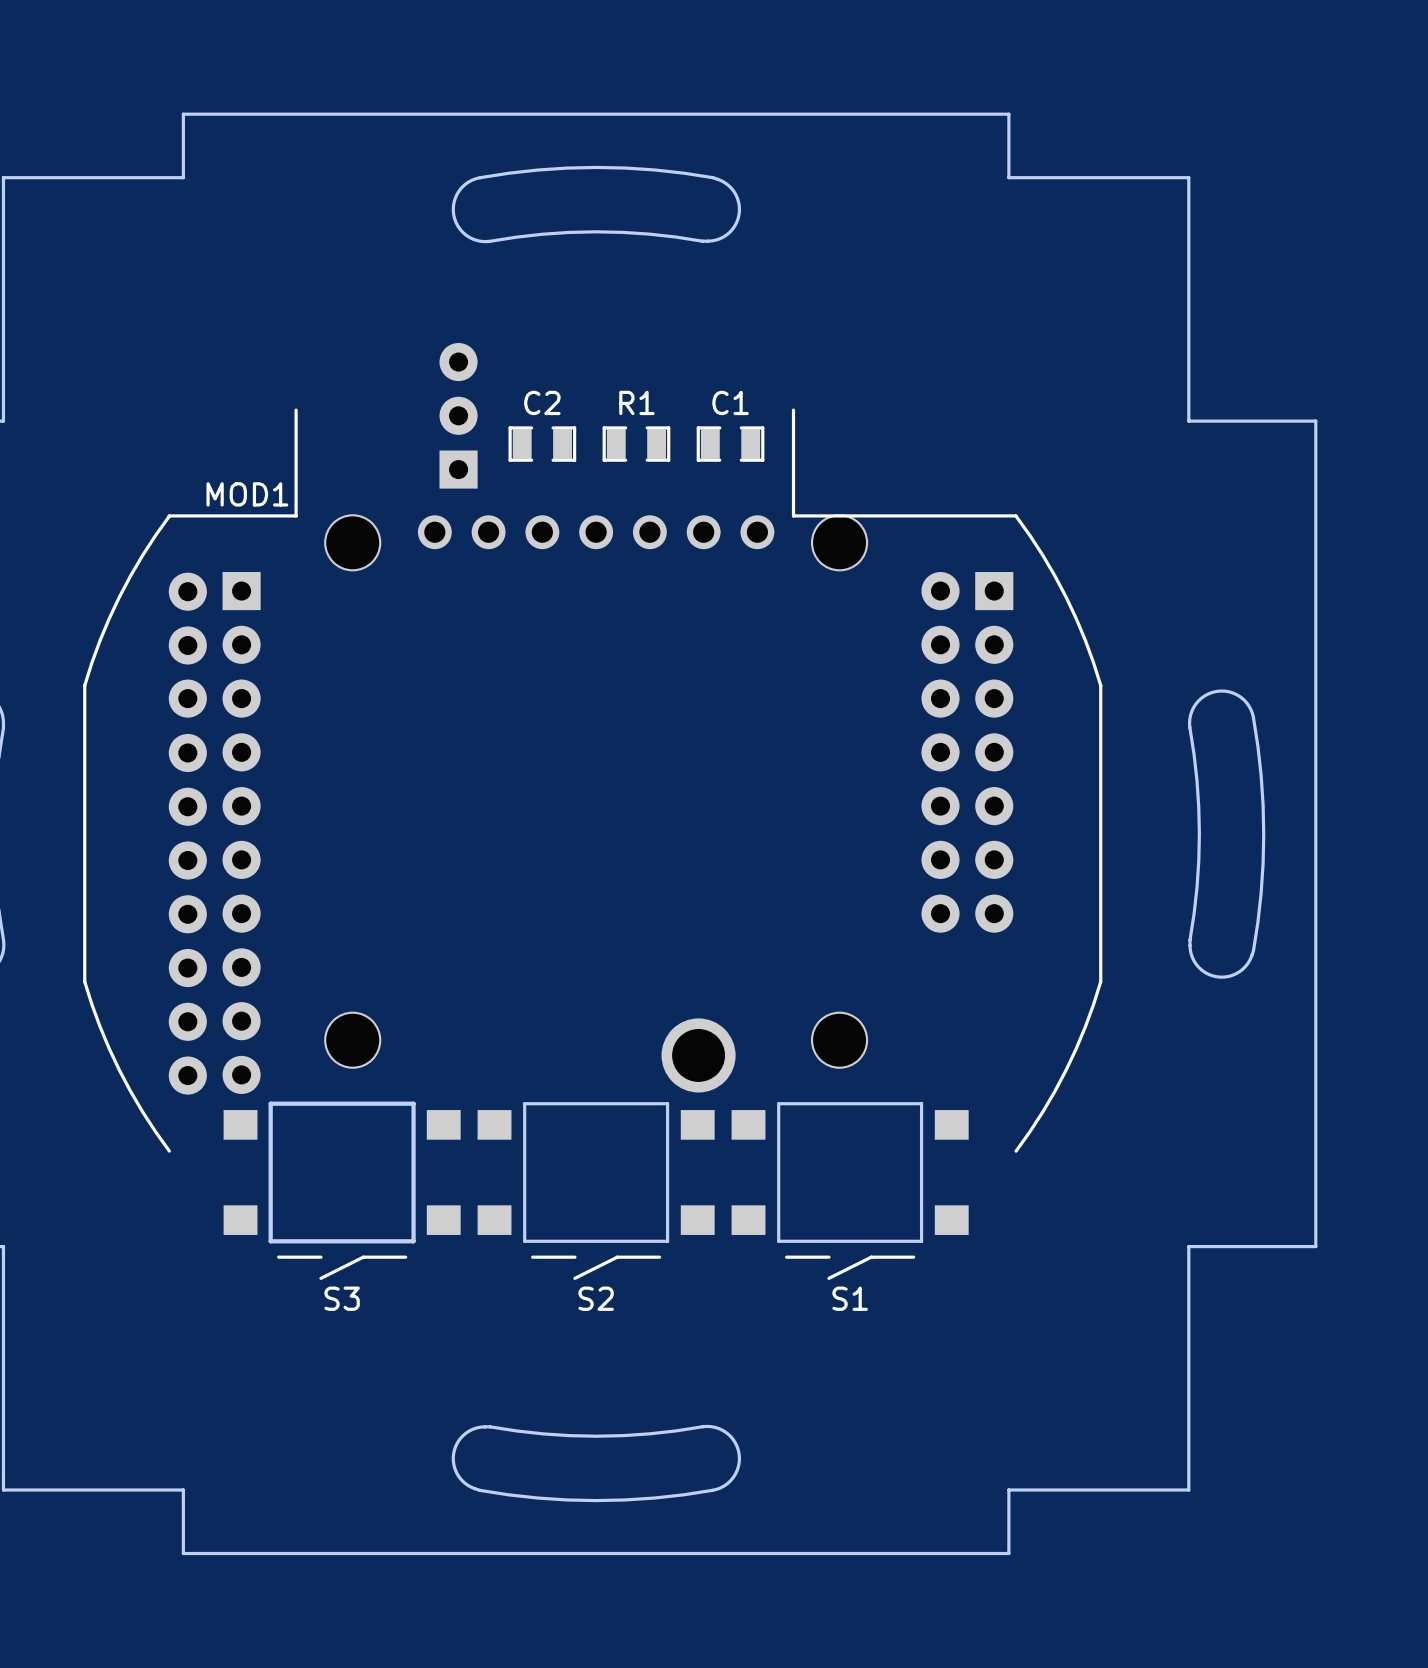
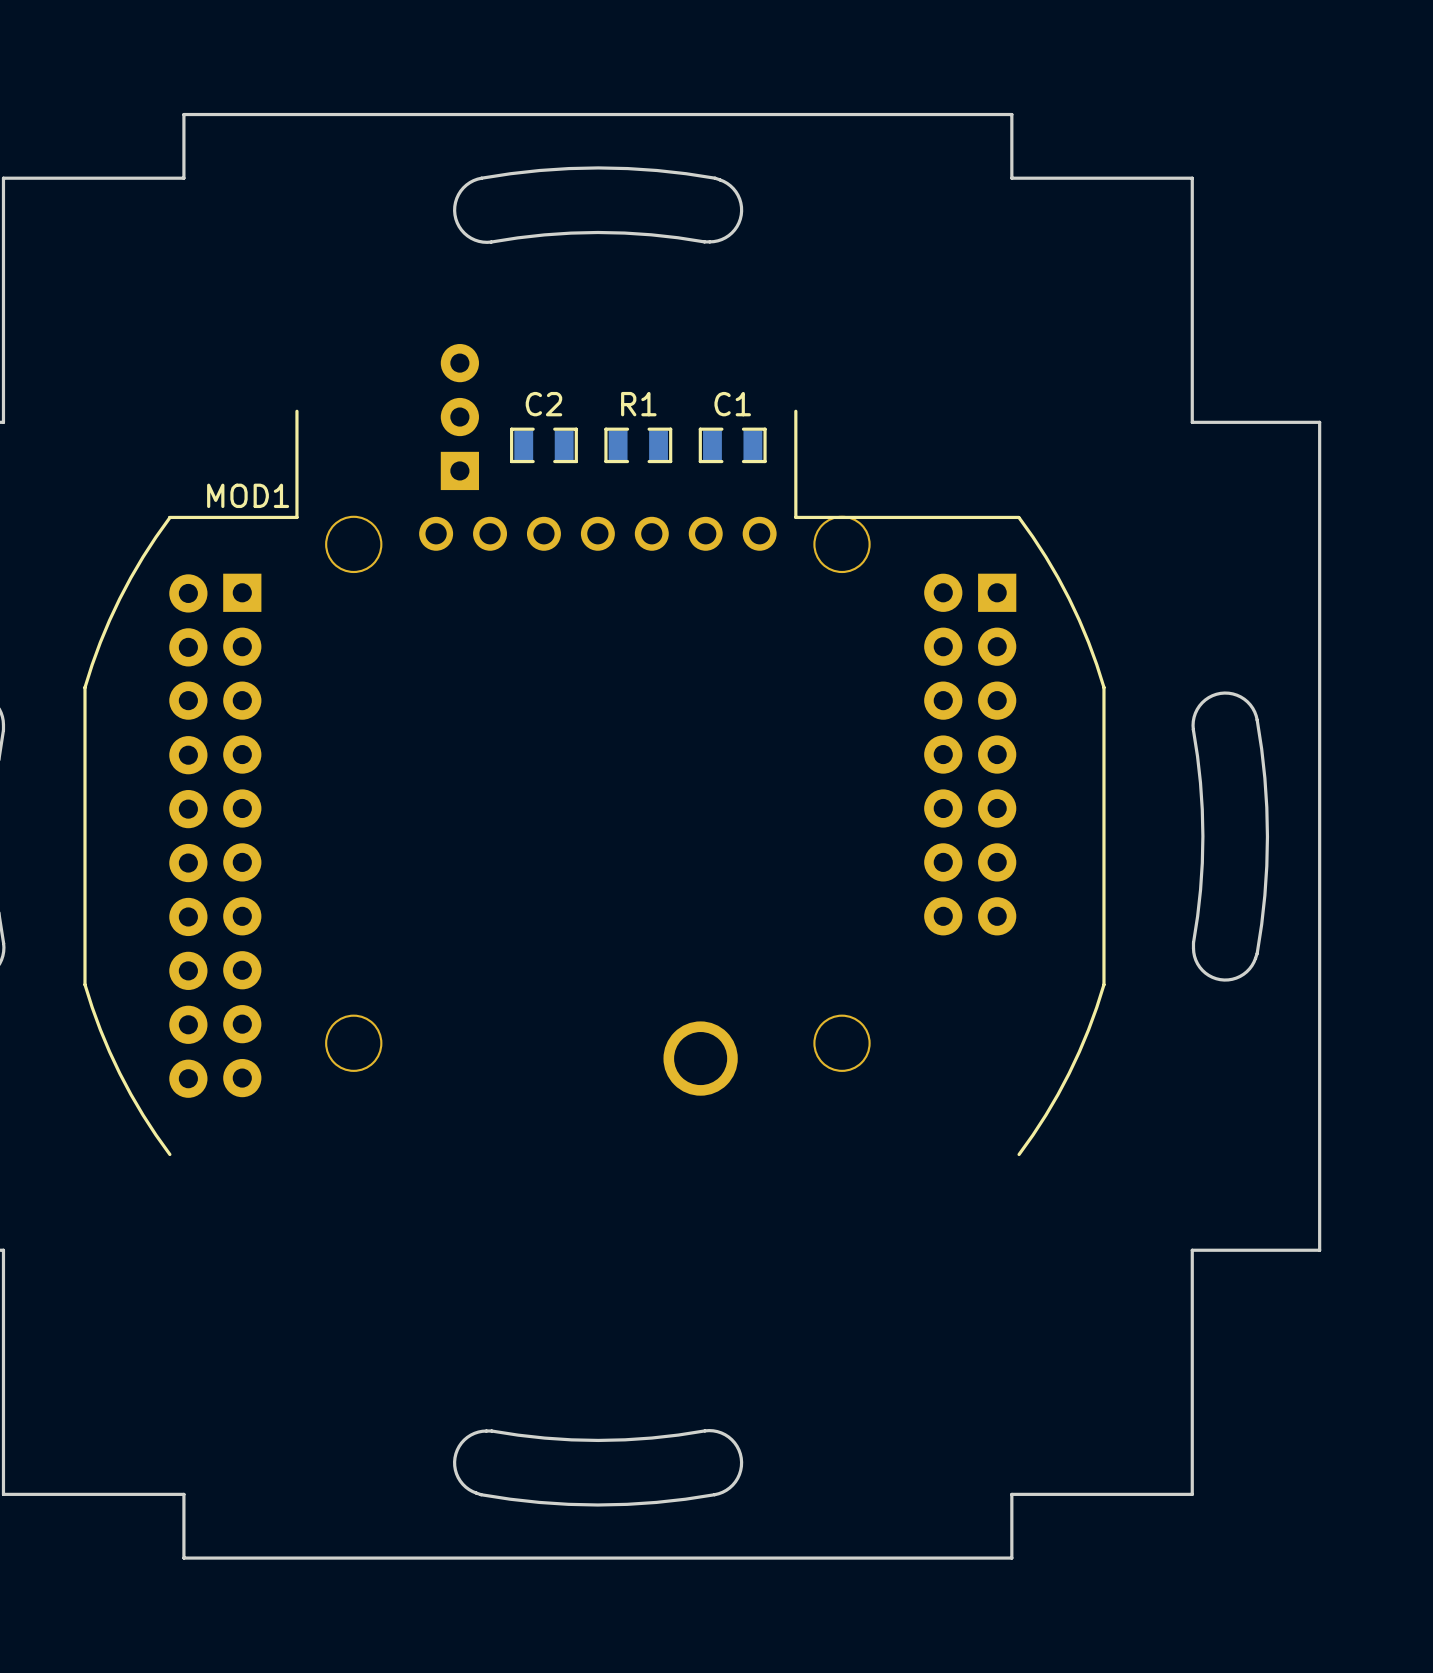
board edge: (413, 1103) (270, 1103) (270, 1241) (413, 1241) (413, 1103) -> none
board edge: (667, 1103) (667, 1241) (524, 1241) (524, 1103) (667, 1103) -> none
board edge: (921, 1103) (778, 1103) (778, 1241) (921, 1241) (921, 1103) -> none
S3: (342, 1194) -> none
S2: (596, 1194) -> none
S1: (850, 1194) -> none

